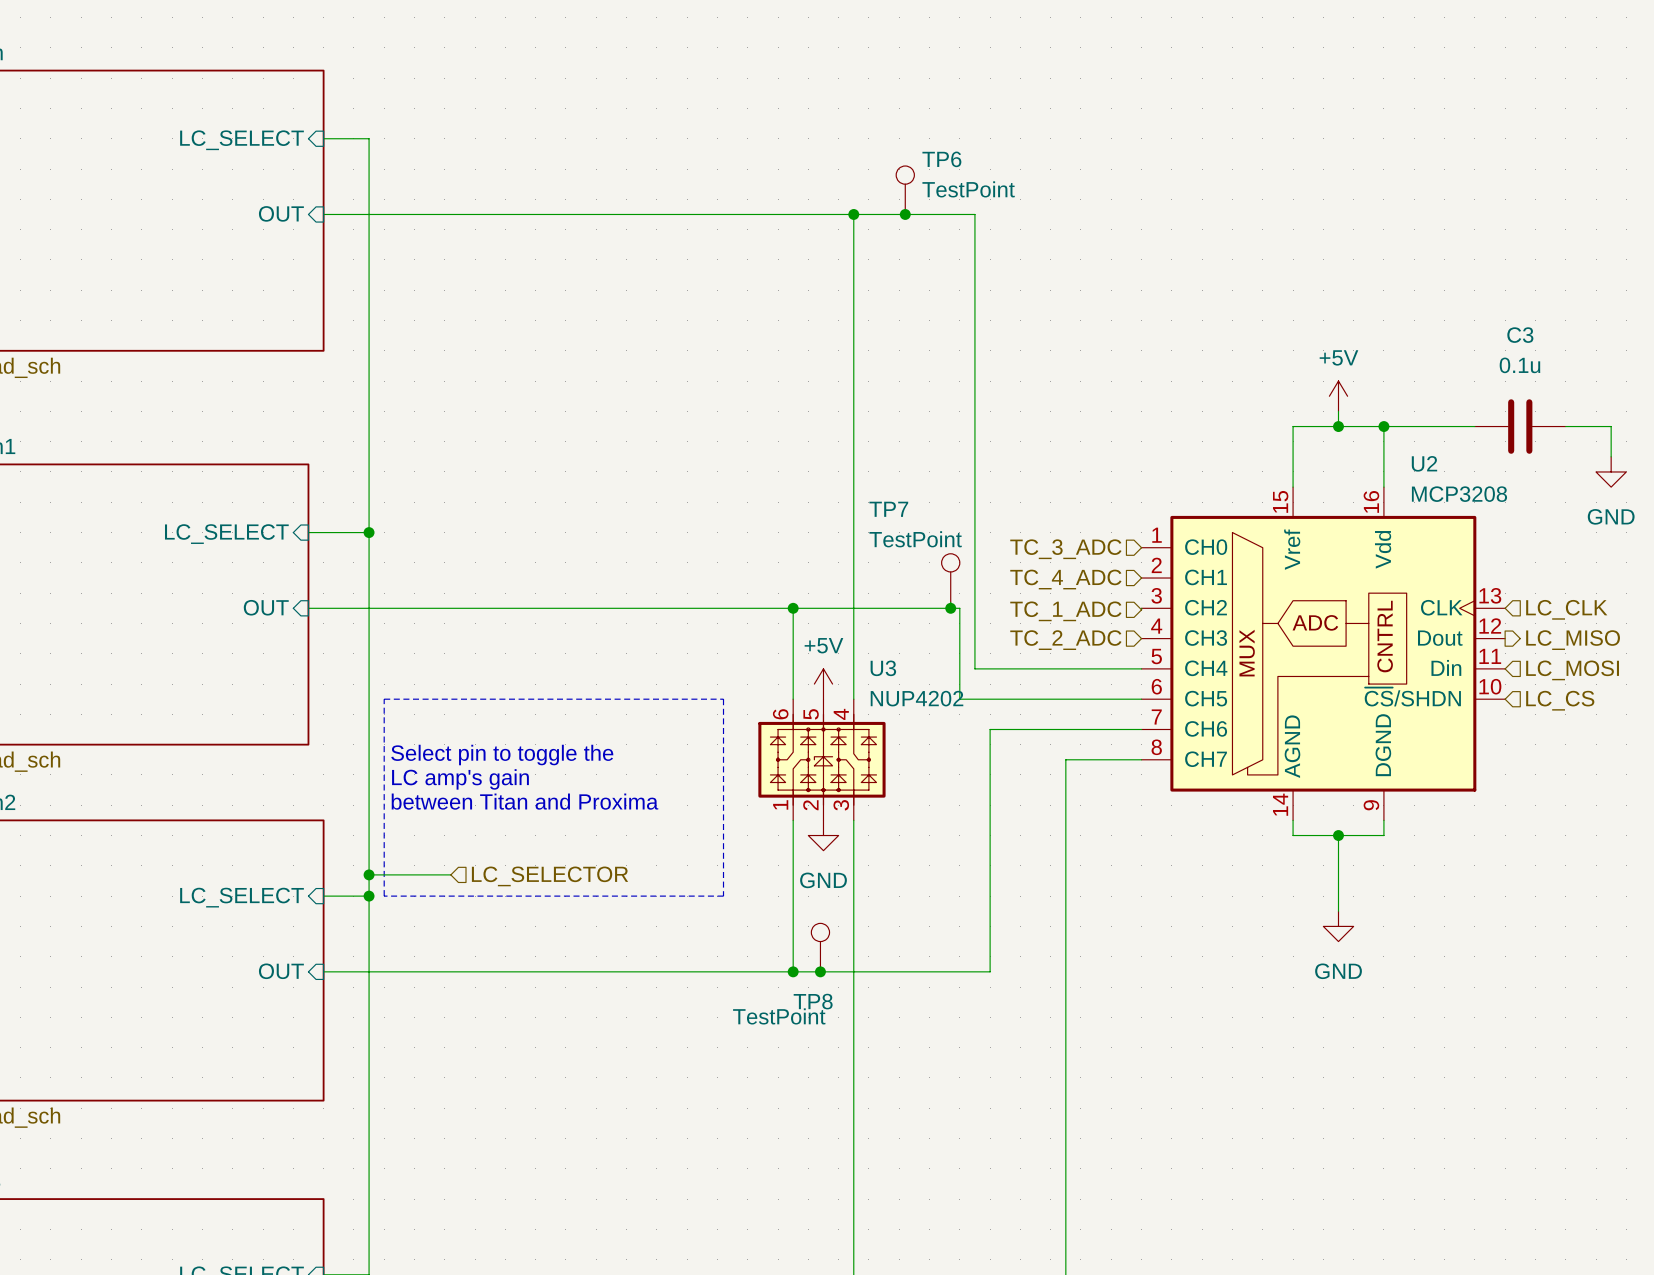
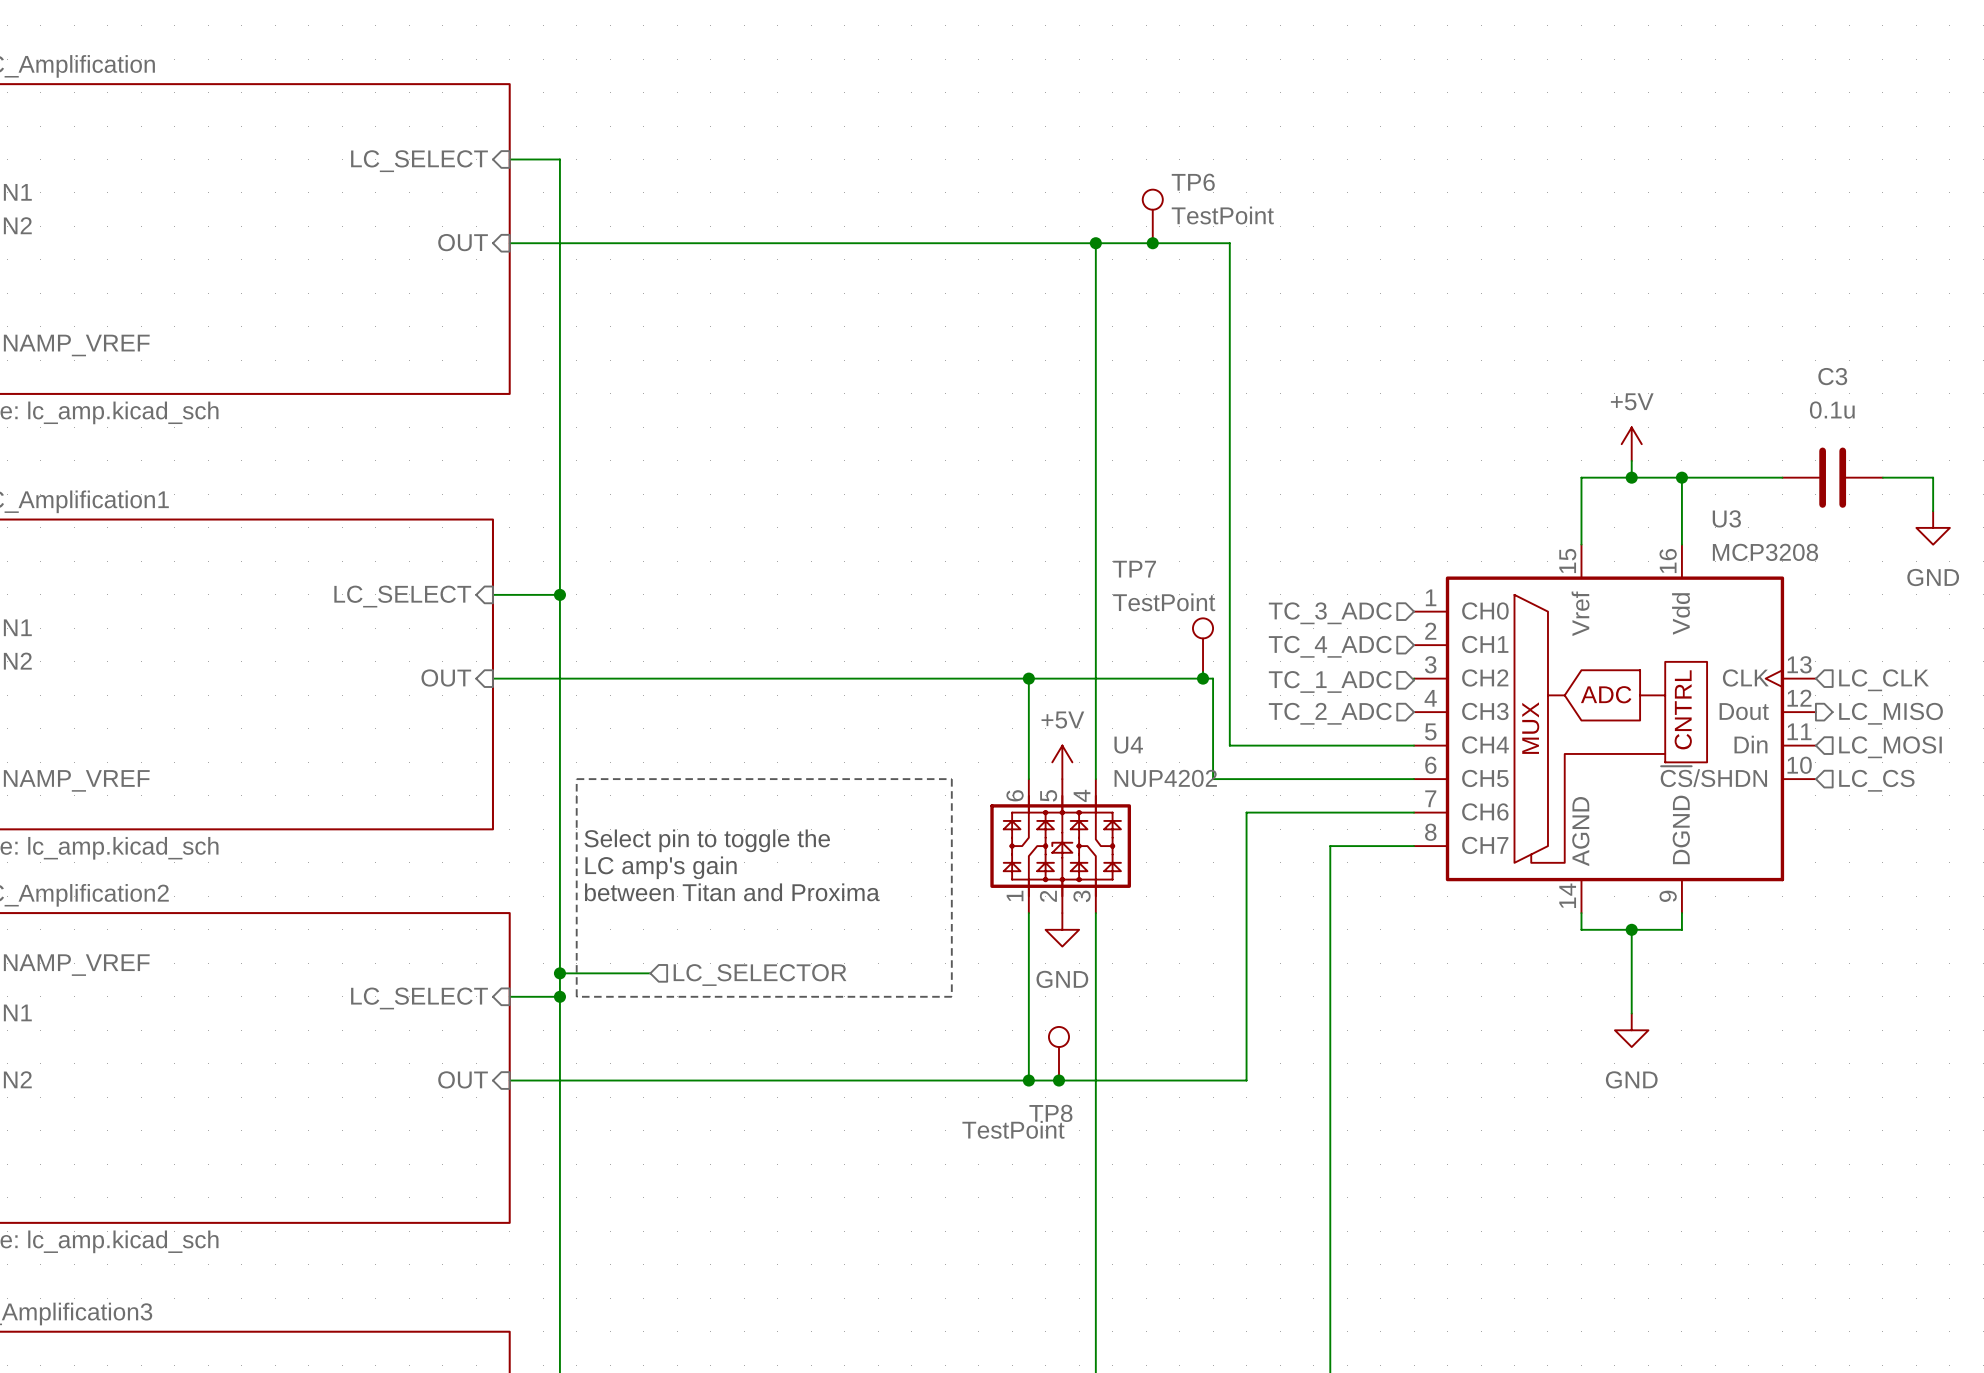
U2 name: U2 (1424, 463) -> U3 (1726, 518)
U3 name: U3 (883, 668) -> U4 (1128, 745)

